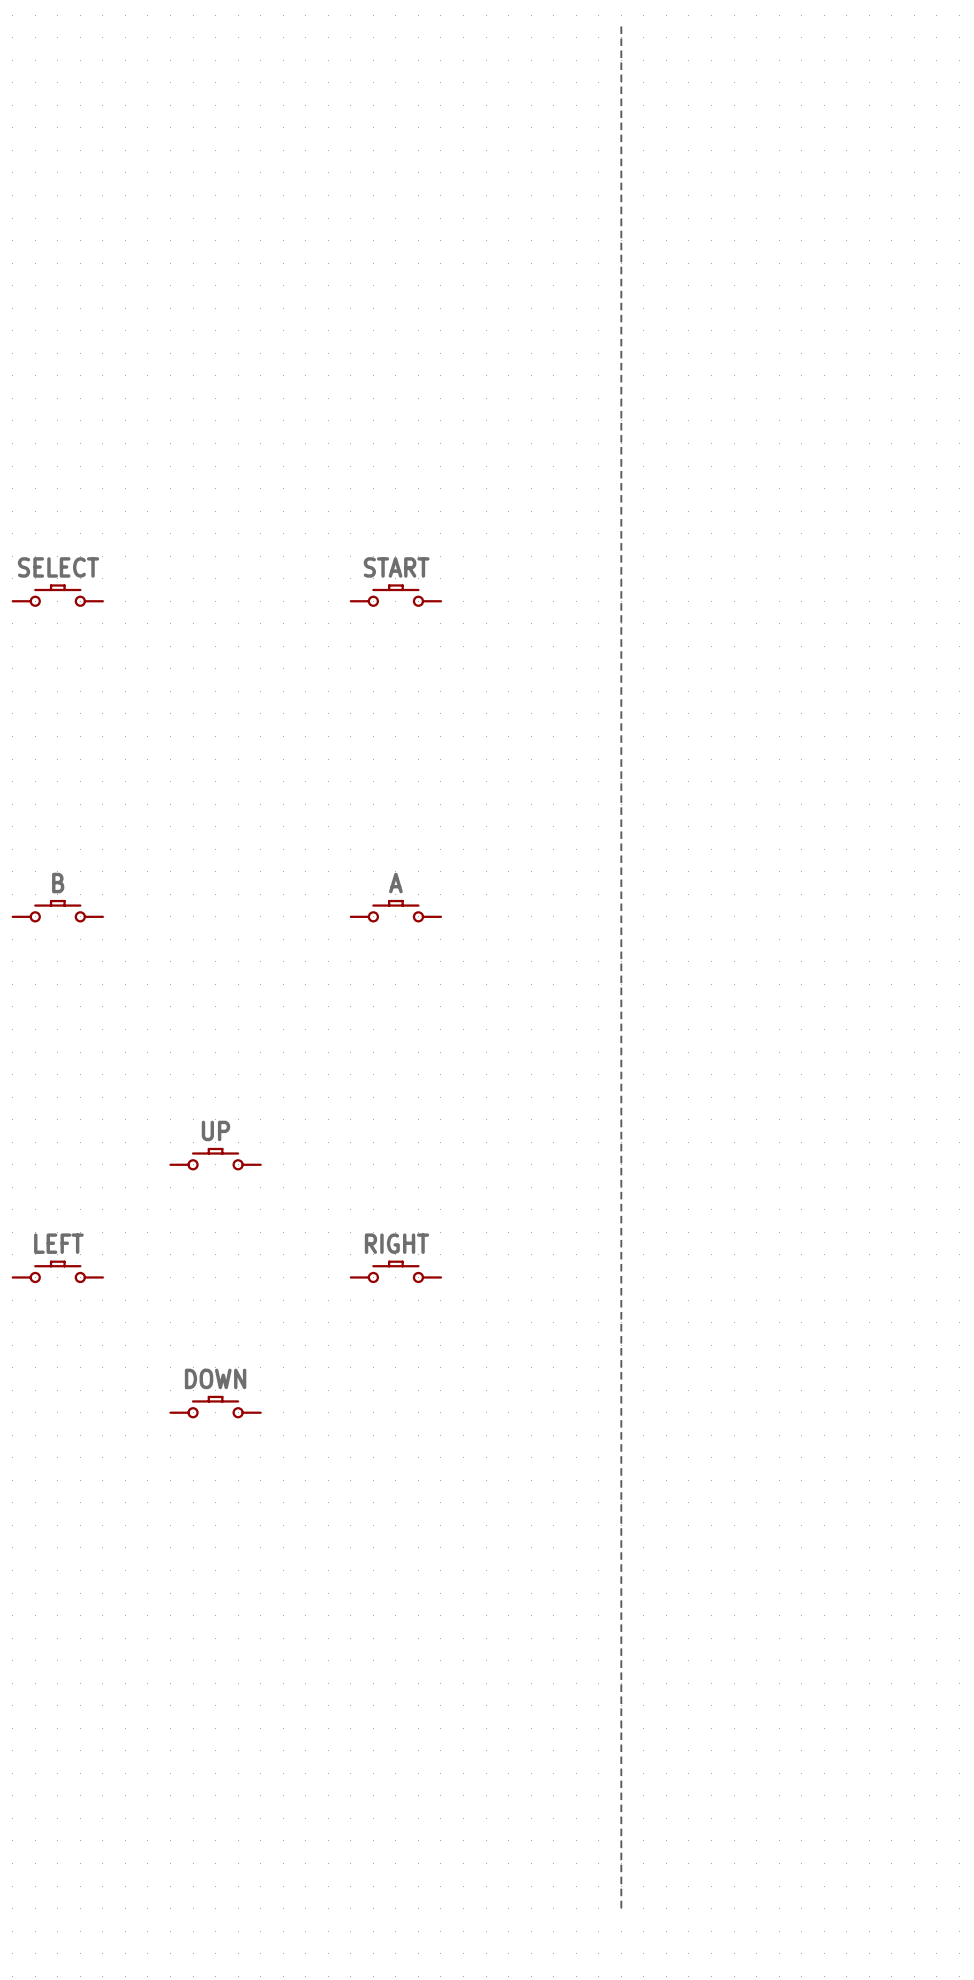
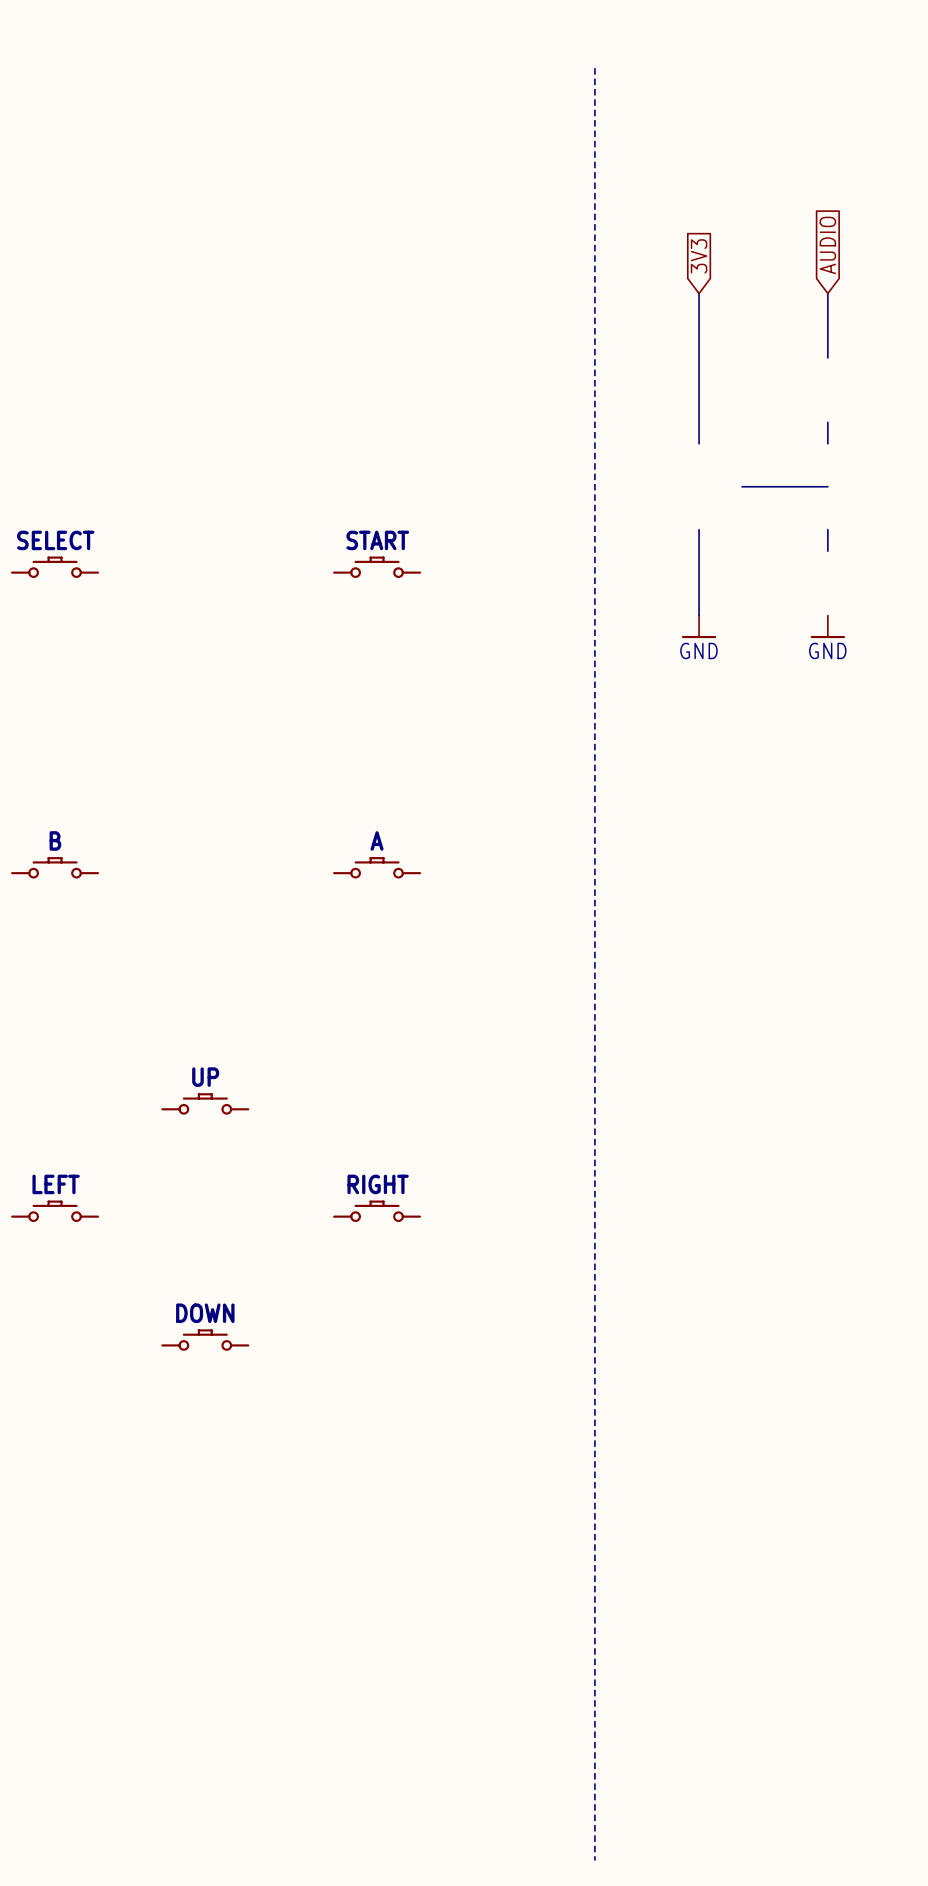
line: (621, 26) (621, 1908) -> (594, 68) (594, 1860)
global label: none -> AUDIO (827, 245)
global label: none -> 3V3 (699, 256)
wire: none -> (699, 293) (699, 443)
wire: none -> (827, 293) (827, 357)
wire: none -> (827, 422) (827, 443)
wire: none -> (741, 486) (827, 486)
wire: none -> (699, 529) (699, 615)
wire: none -> (827, 529) (827, 551)
power symbol: none -> GND (699, 626)
power symbol: none -> GND (827, 626)

